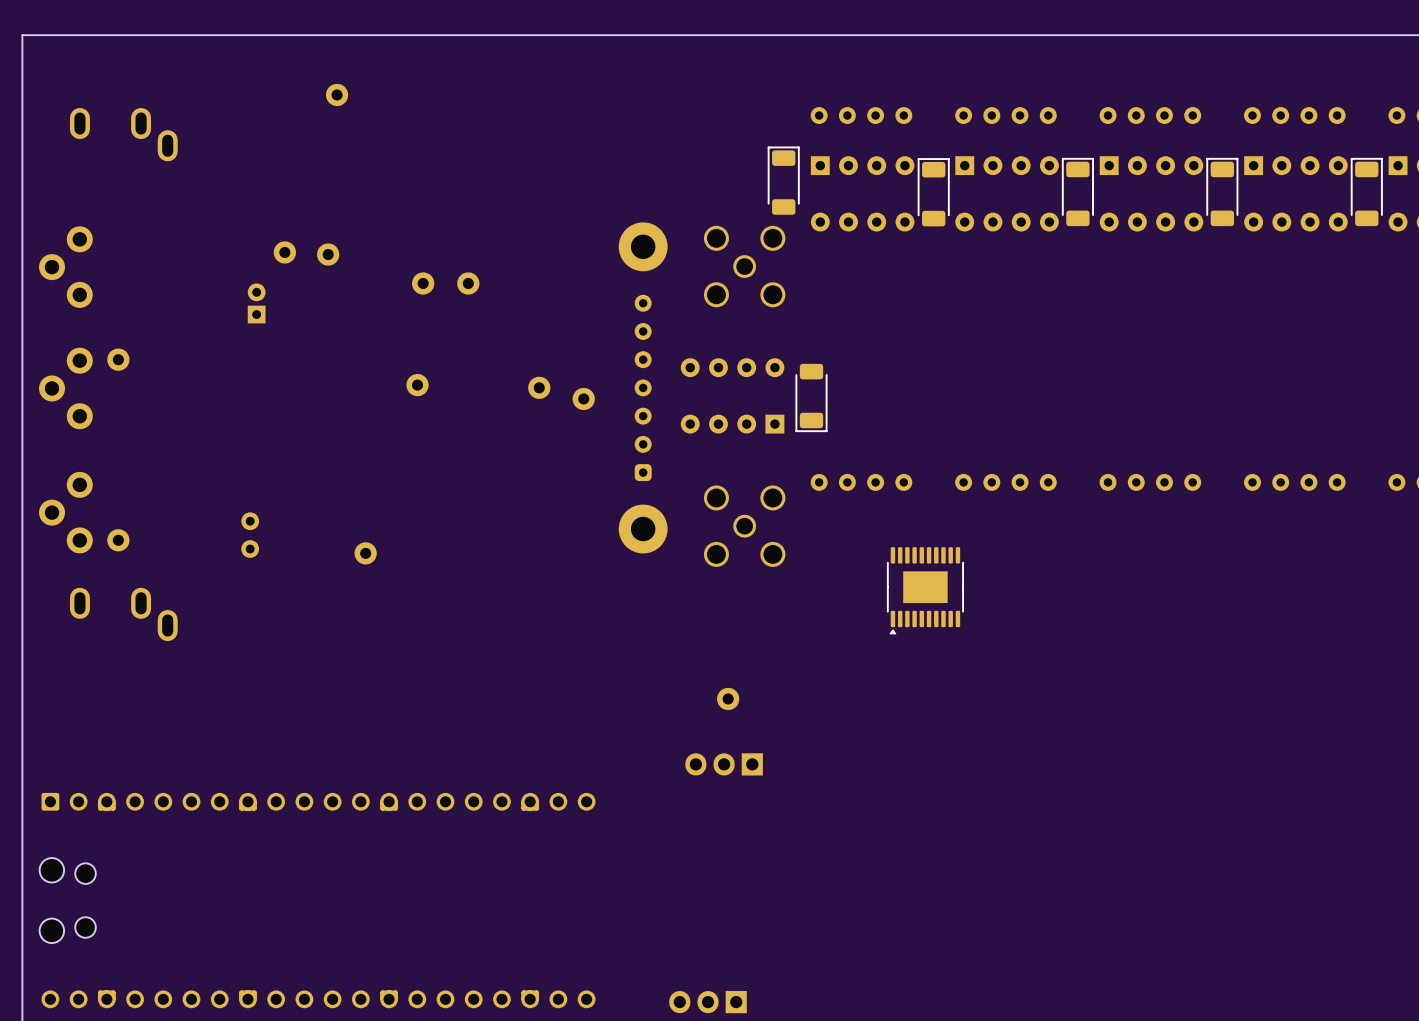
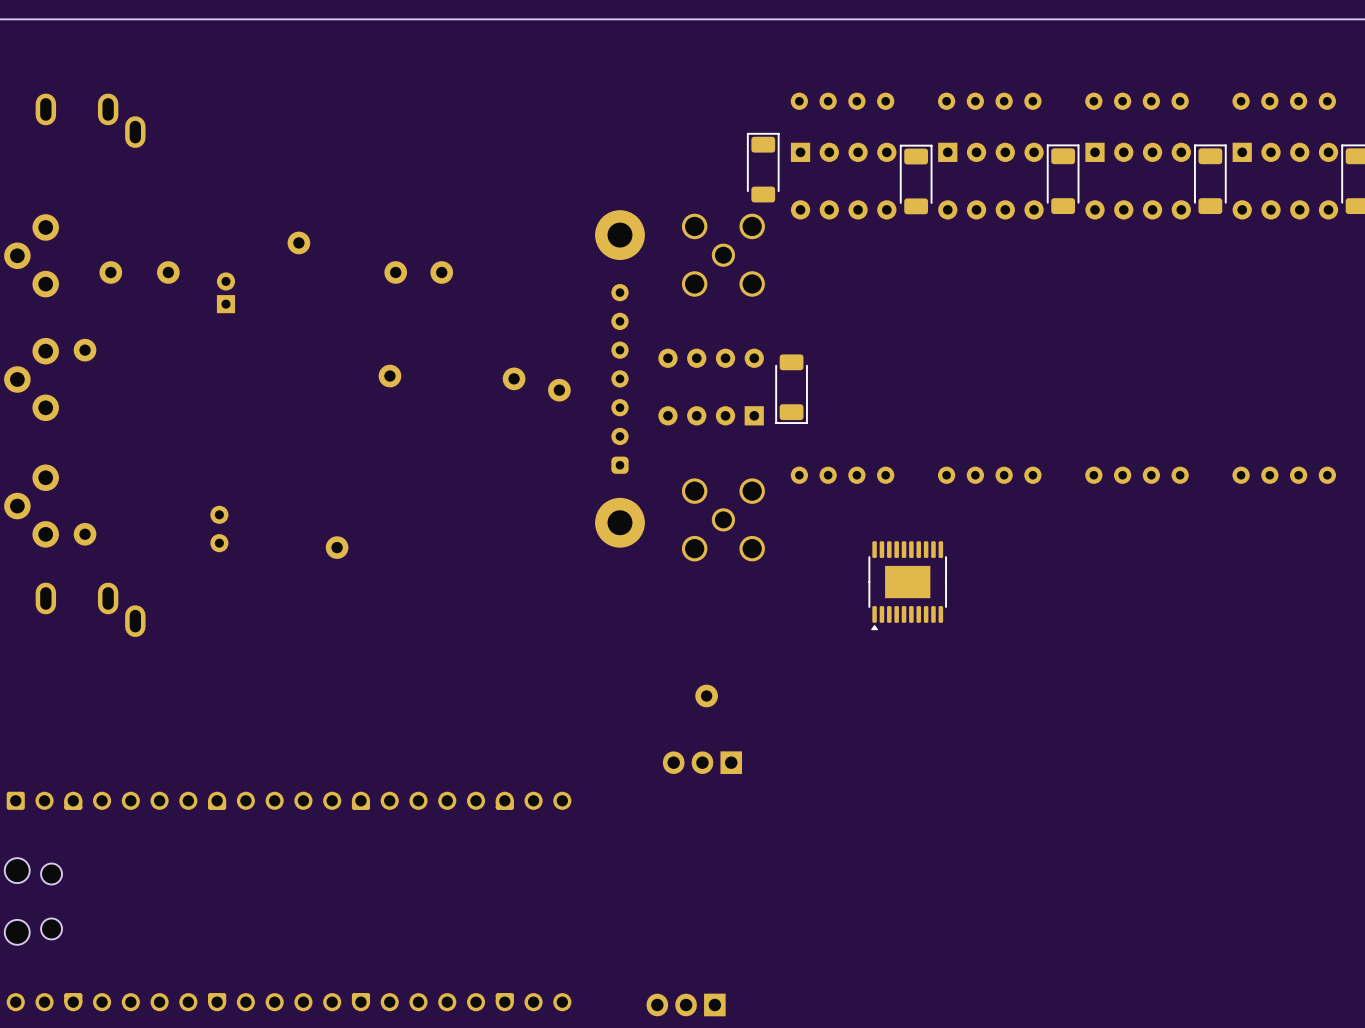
part: (337, 94) -> none
part: (284, 252) -> none
part: none -> (110, 272)
part: none -> (168, 272)

